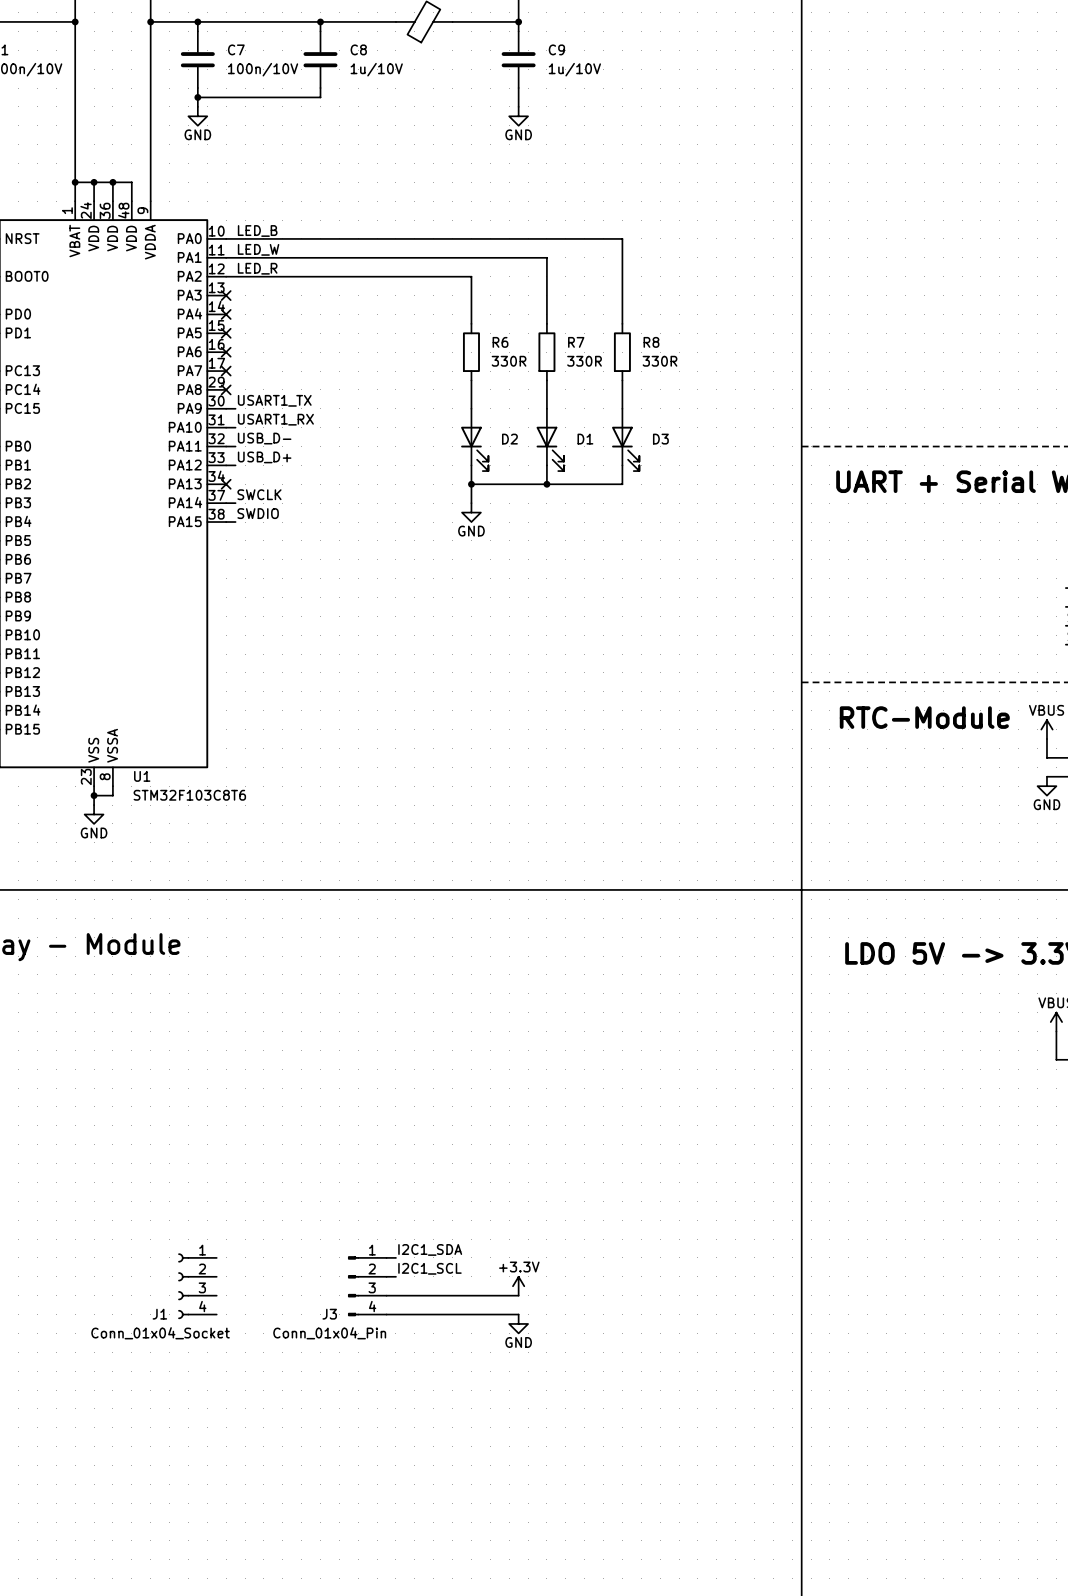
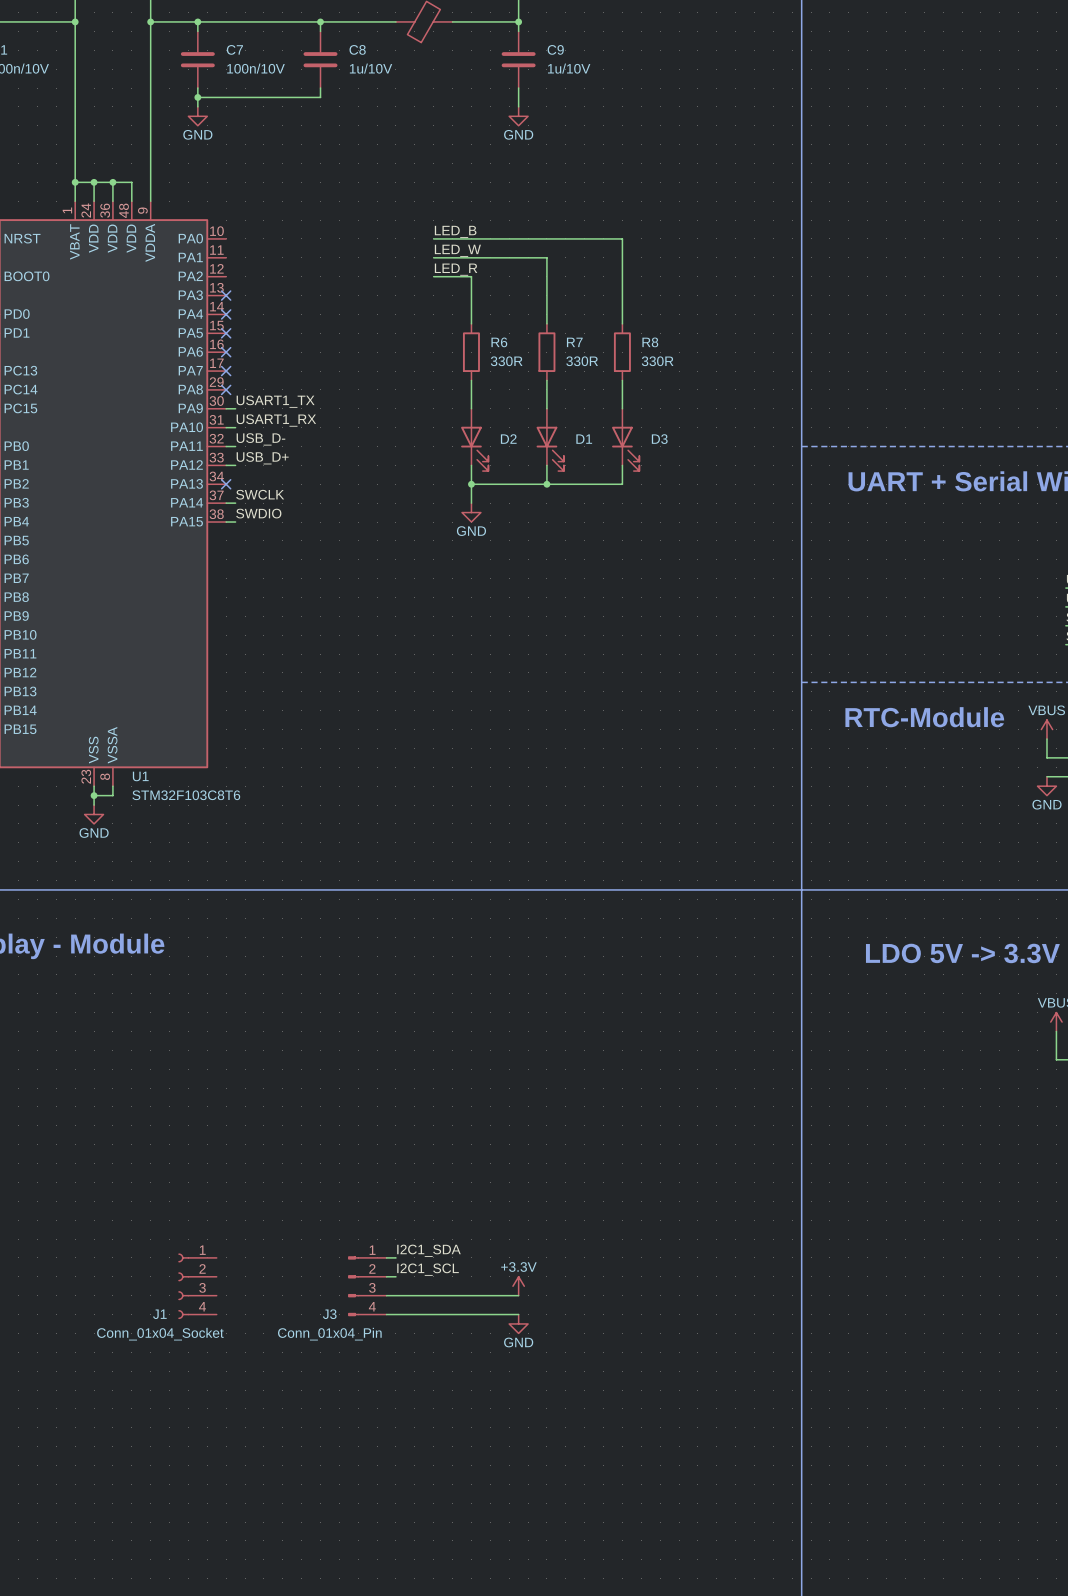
label: LED_B (257, 230) -> none
label: none -> LED_B (455, 231)
wire: (226, 238) (433, 238) -> none
label: LED_W (258, 249) -> none
label: none -> LED_W (457, 250)
wire: (226, 257) (433, 257) -> none
label: LED_R (257, 268) -> none
label: none -> LED_R (456, 269)
wire: (226, 276) (433, 276) -> none

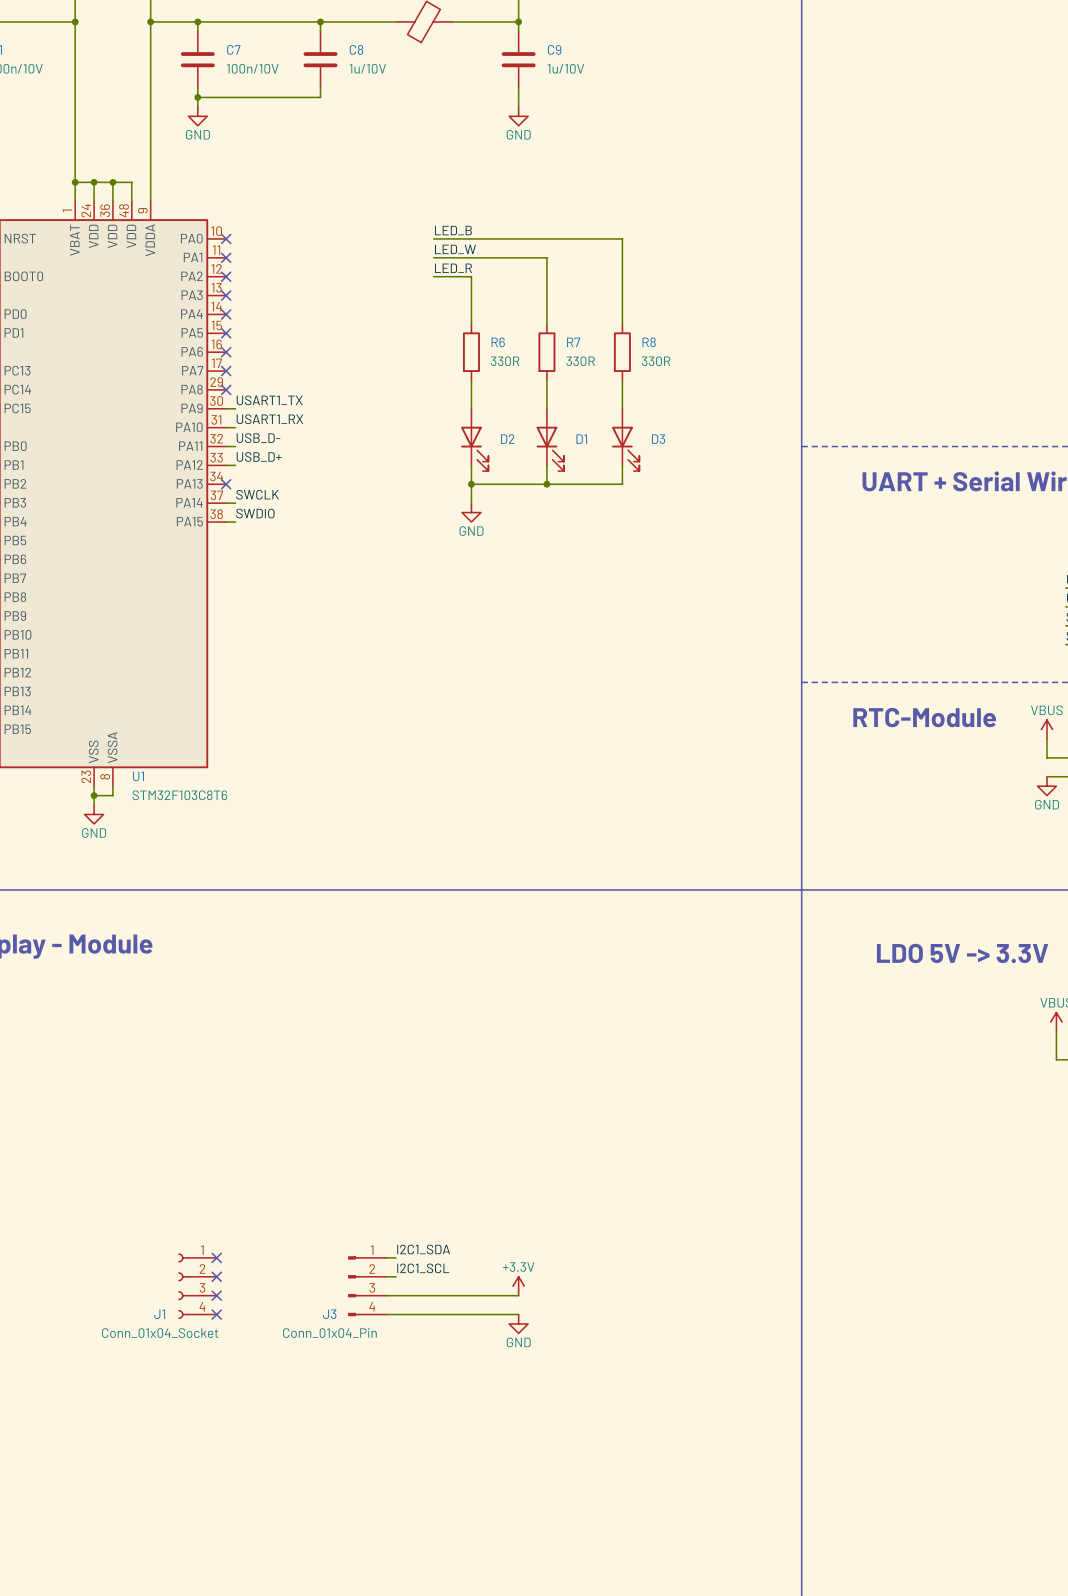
no-connect mark: none -> (226, 238)
no-connect mark: none -> (226, 257)
no-connect mark: none -> (226, 276)
no-connect mark: none -> (216, 1257)
no-connect mark: none -> (216, 1276)
no-connect mark: none -> (216, 1295)
no-connect mark: none -> (216, 1314)

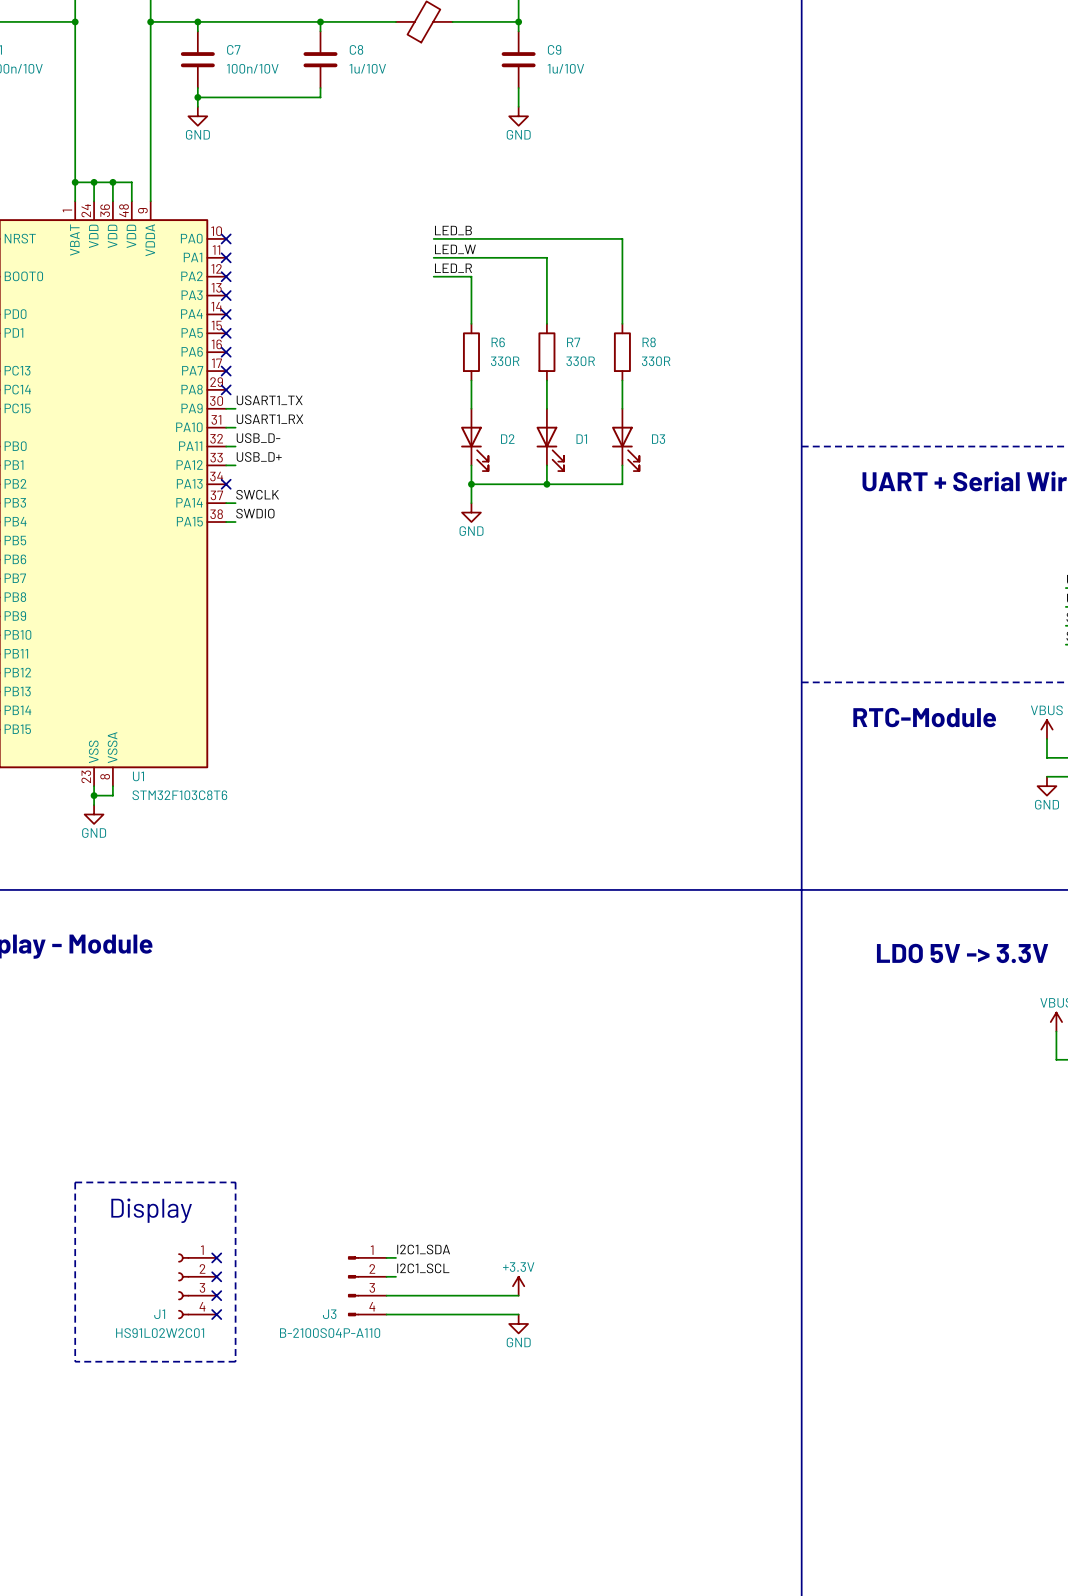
line: none -> (75, 1182) (75, 1361) (235, 1361) (235, 1182) (75, 1182)
text: none -> Display (151, 1210)
J1 value: Conn_01x04_Socket (160, 1333) -> HS91L02W2C01 (160, 1333)
J3 value: Conn_01x04_Pin (329, 1333) -> B-2100S04P-A110 (330, 1333)

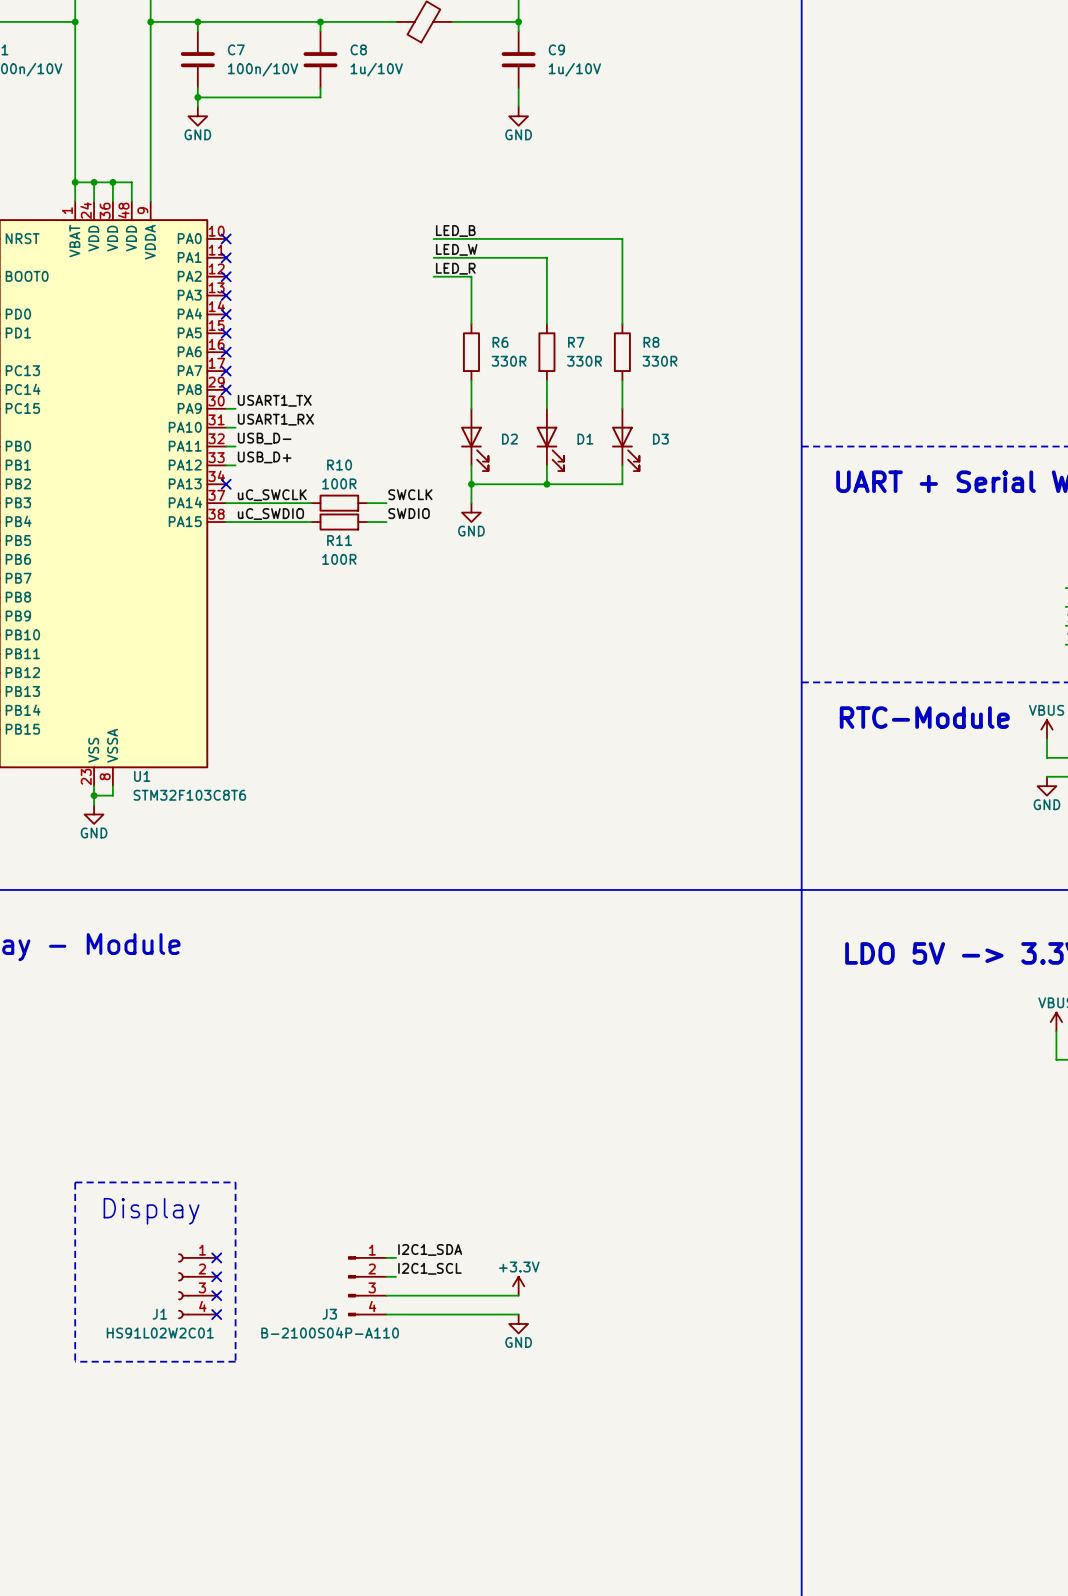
label: SWCLK (257, 494) -> uC_SWCLK (272, 495)
label: none -> SWCLK (410, 494)
wire: none -> (235, 503) (311, 503)
R10: none -> 100R (339, 503)
wire: none -> (367, 503) (386, 503)
label: SWDIO (255, 513) -> uC_SWDIO (270, 514)
label: none -> SWDIO (409, 513)
wire: none -> (235, 522) (311, 522)
R11: none -> 100R (339, 522)
wire: none -> (367, 522) (386, 522)

